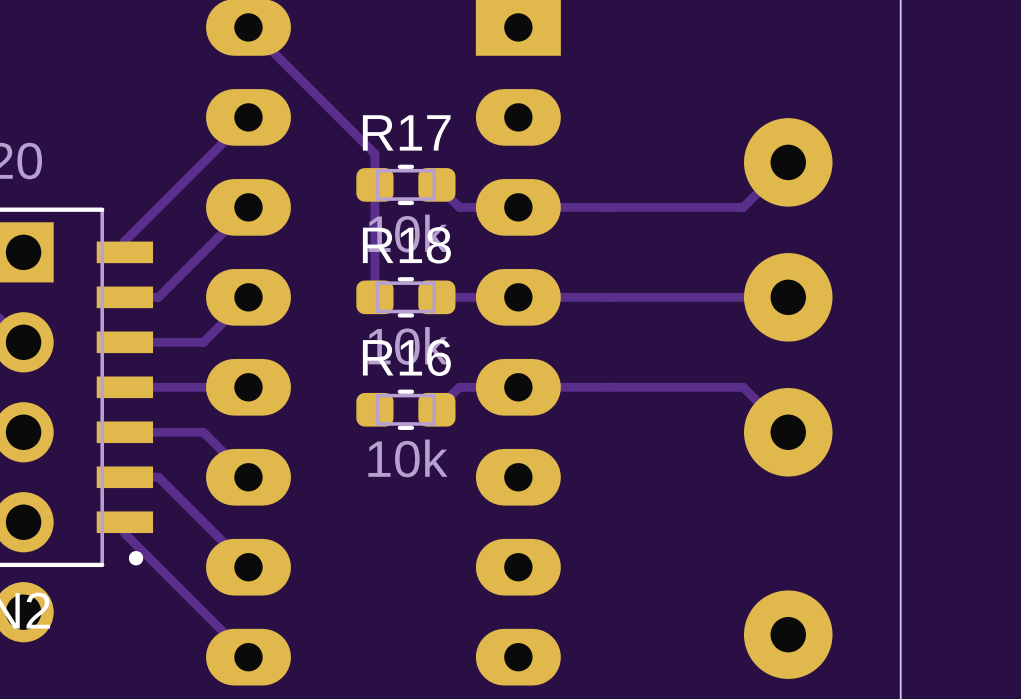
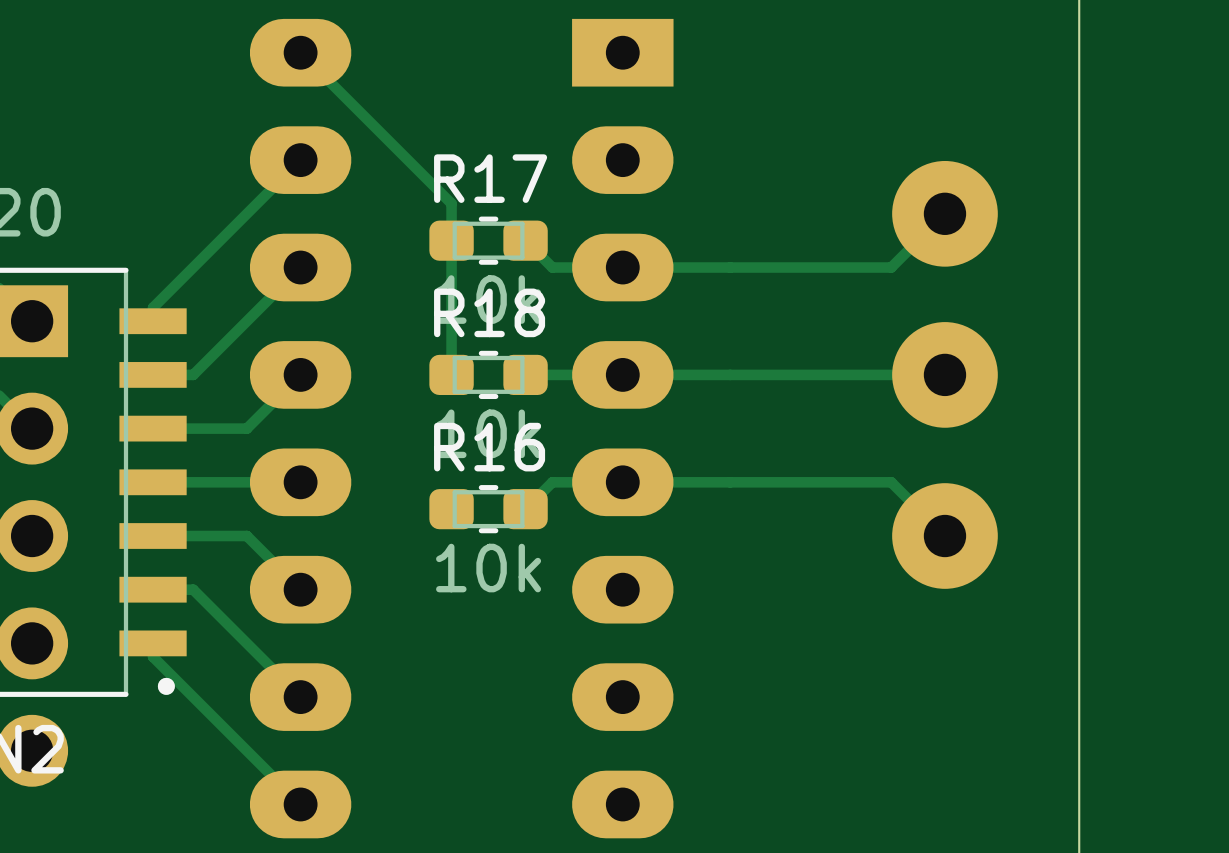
part: (788, 634) -> none

